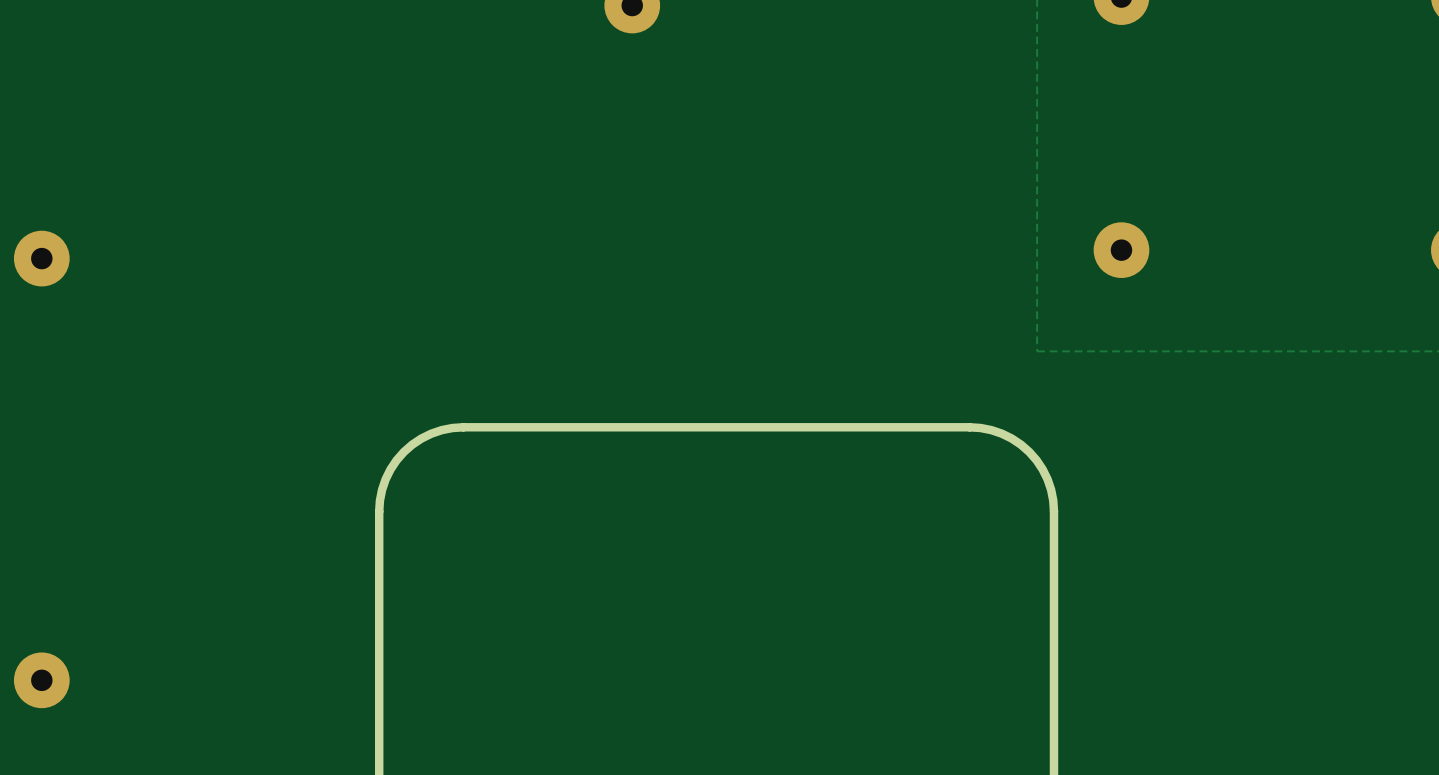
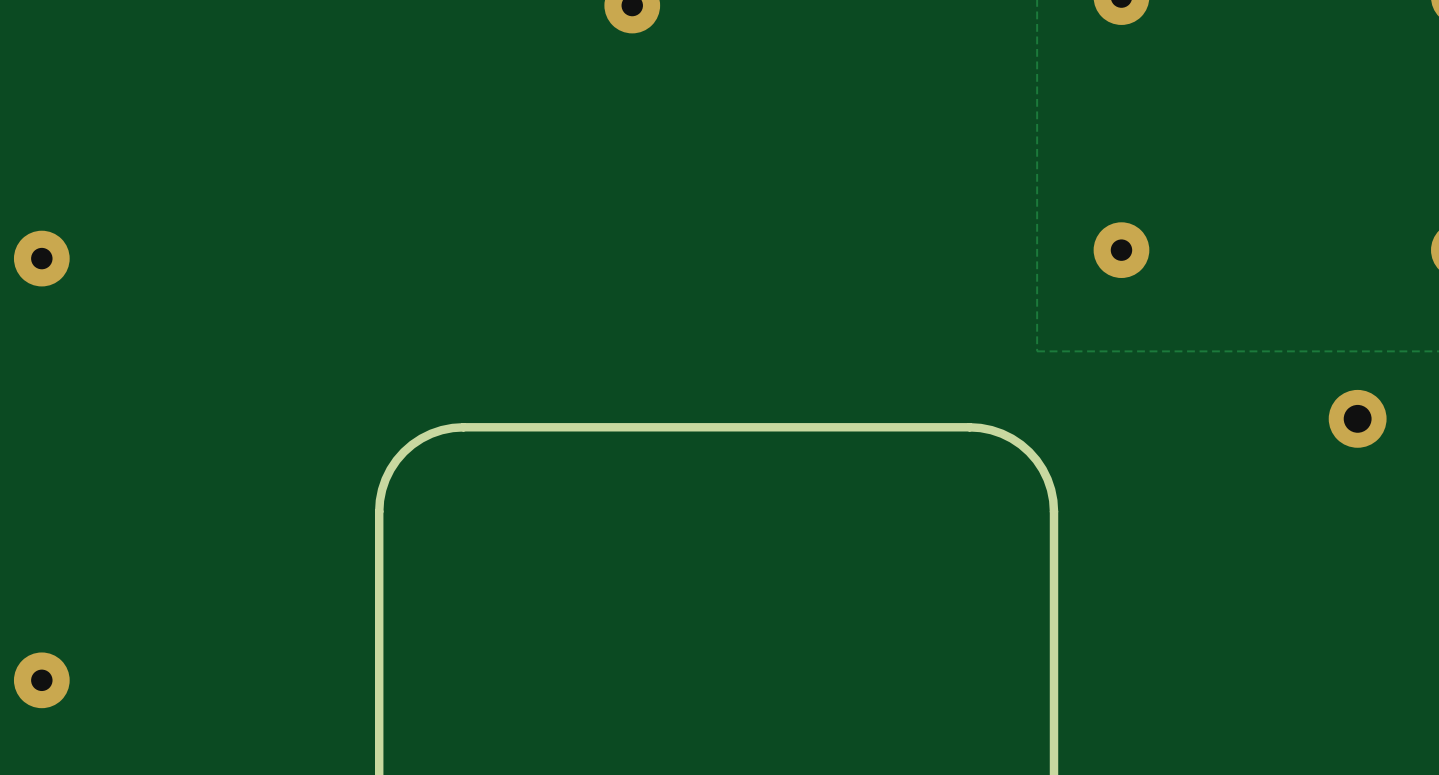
via: none -> (1357, 418)

